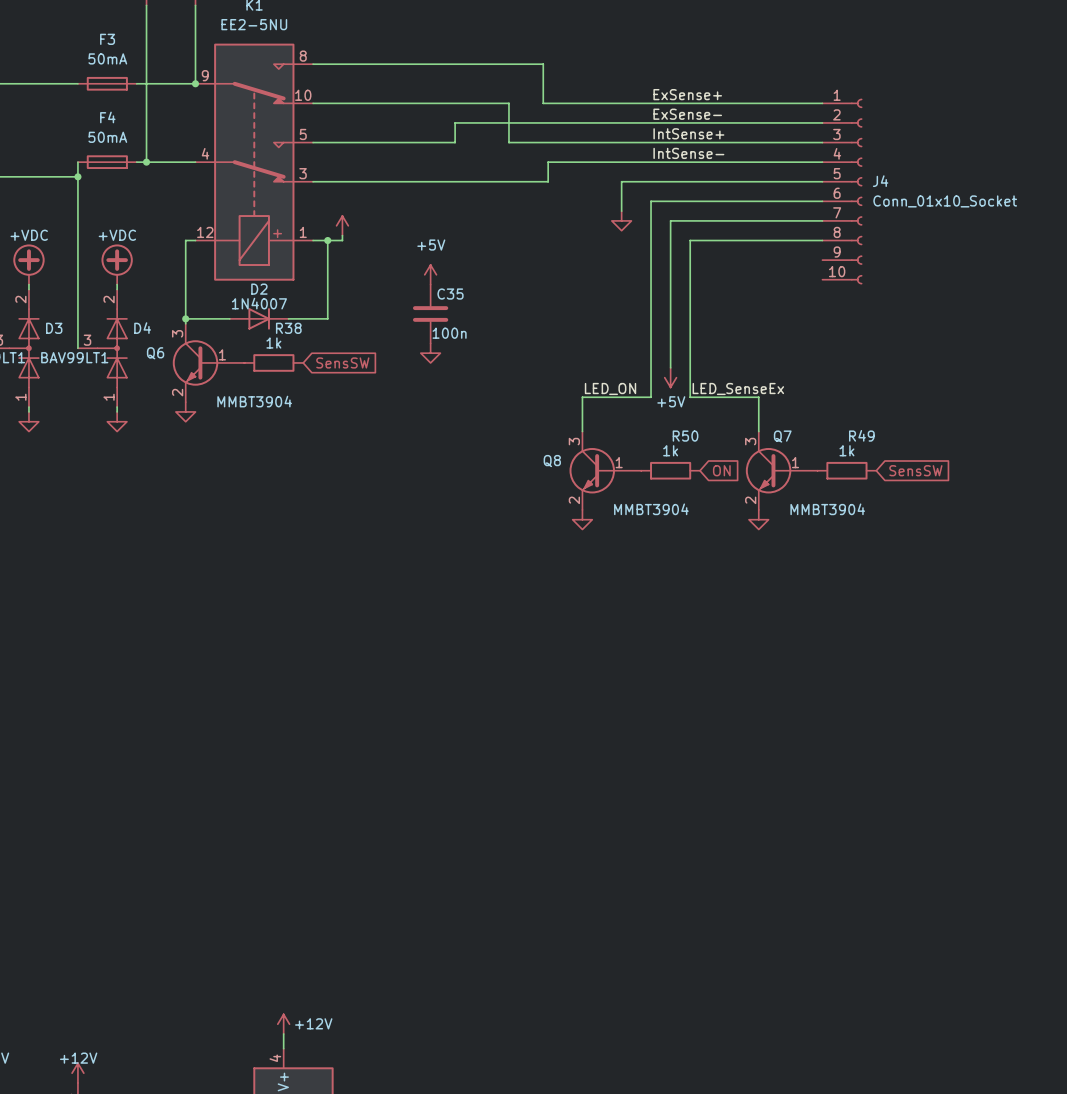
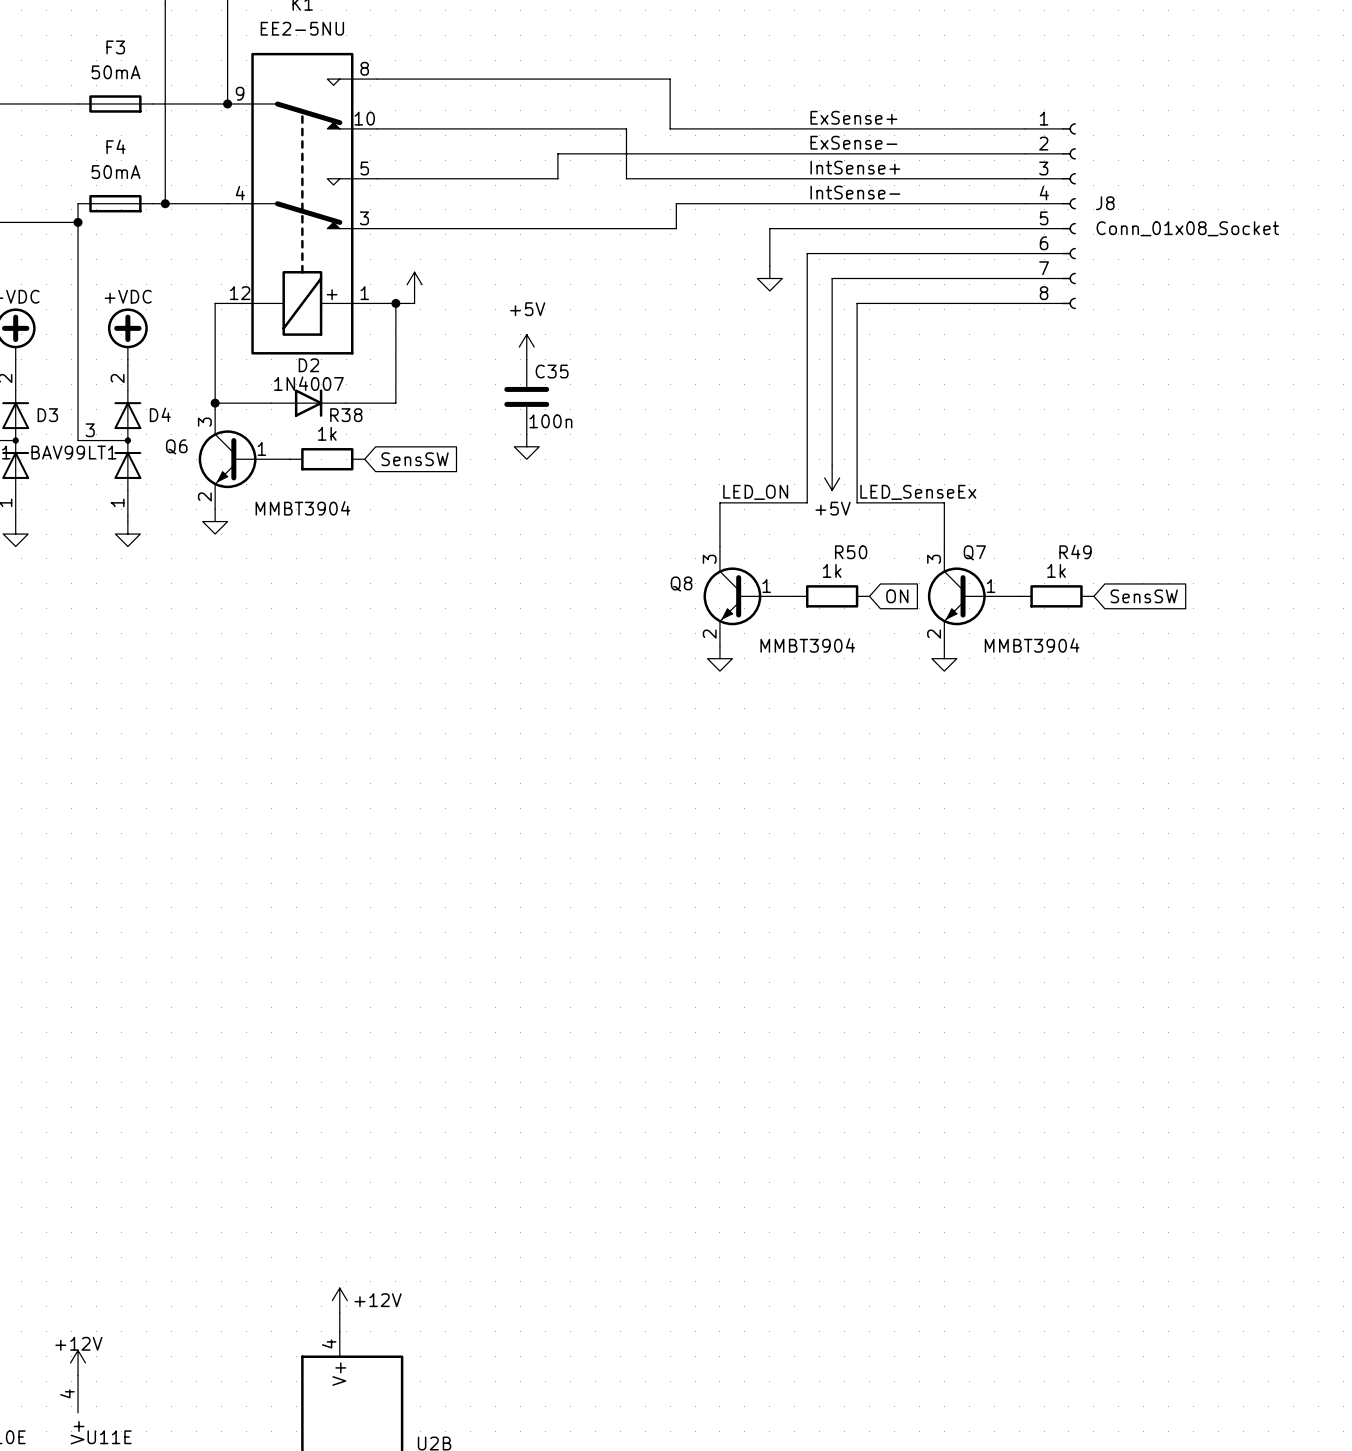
J8: none -> Conn_01x08_Socket (1050, 216)
J4: Conn_01x10_Socket (842, 191) -> none

